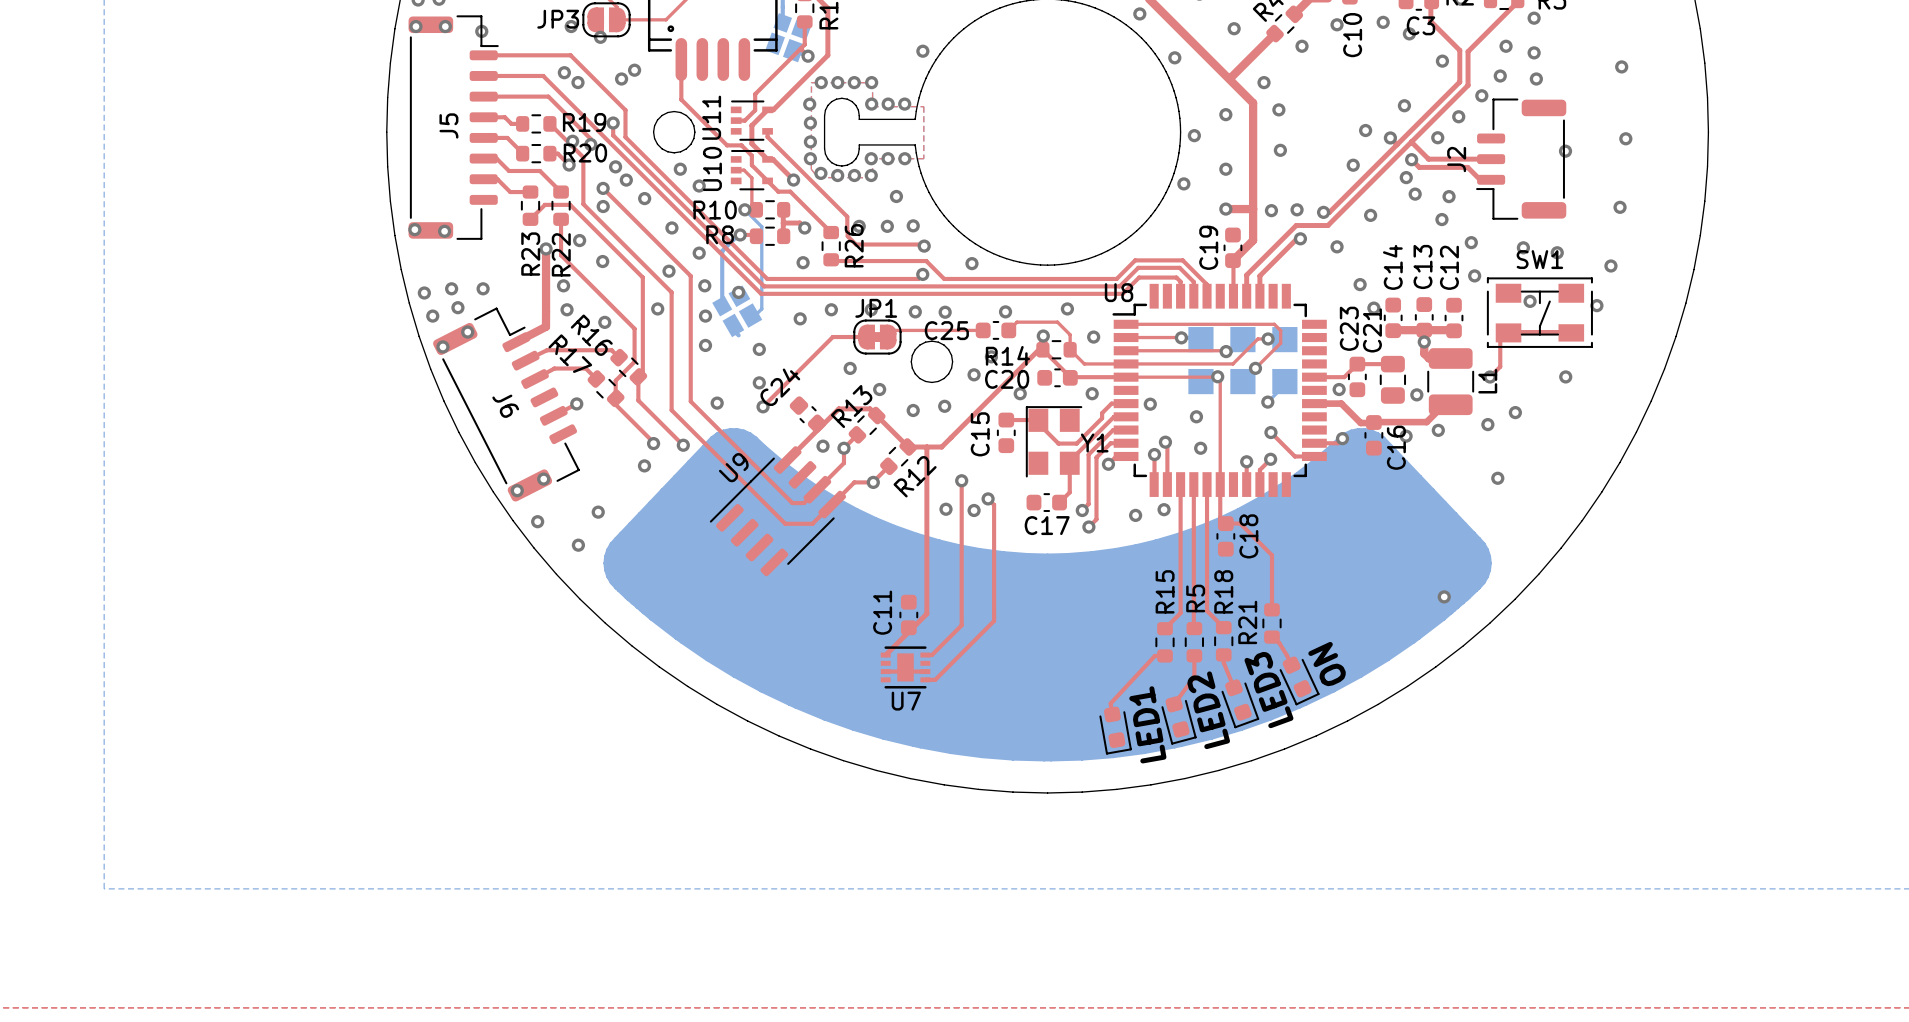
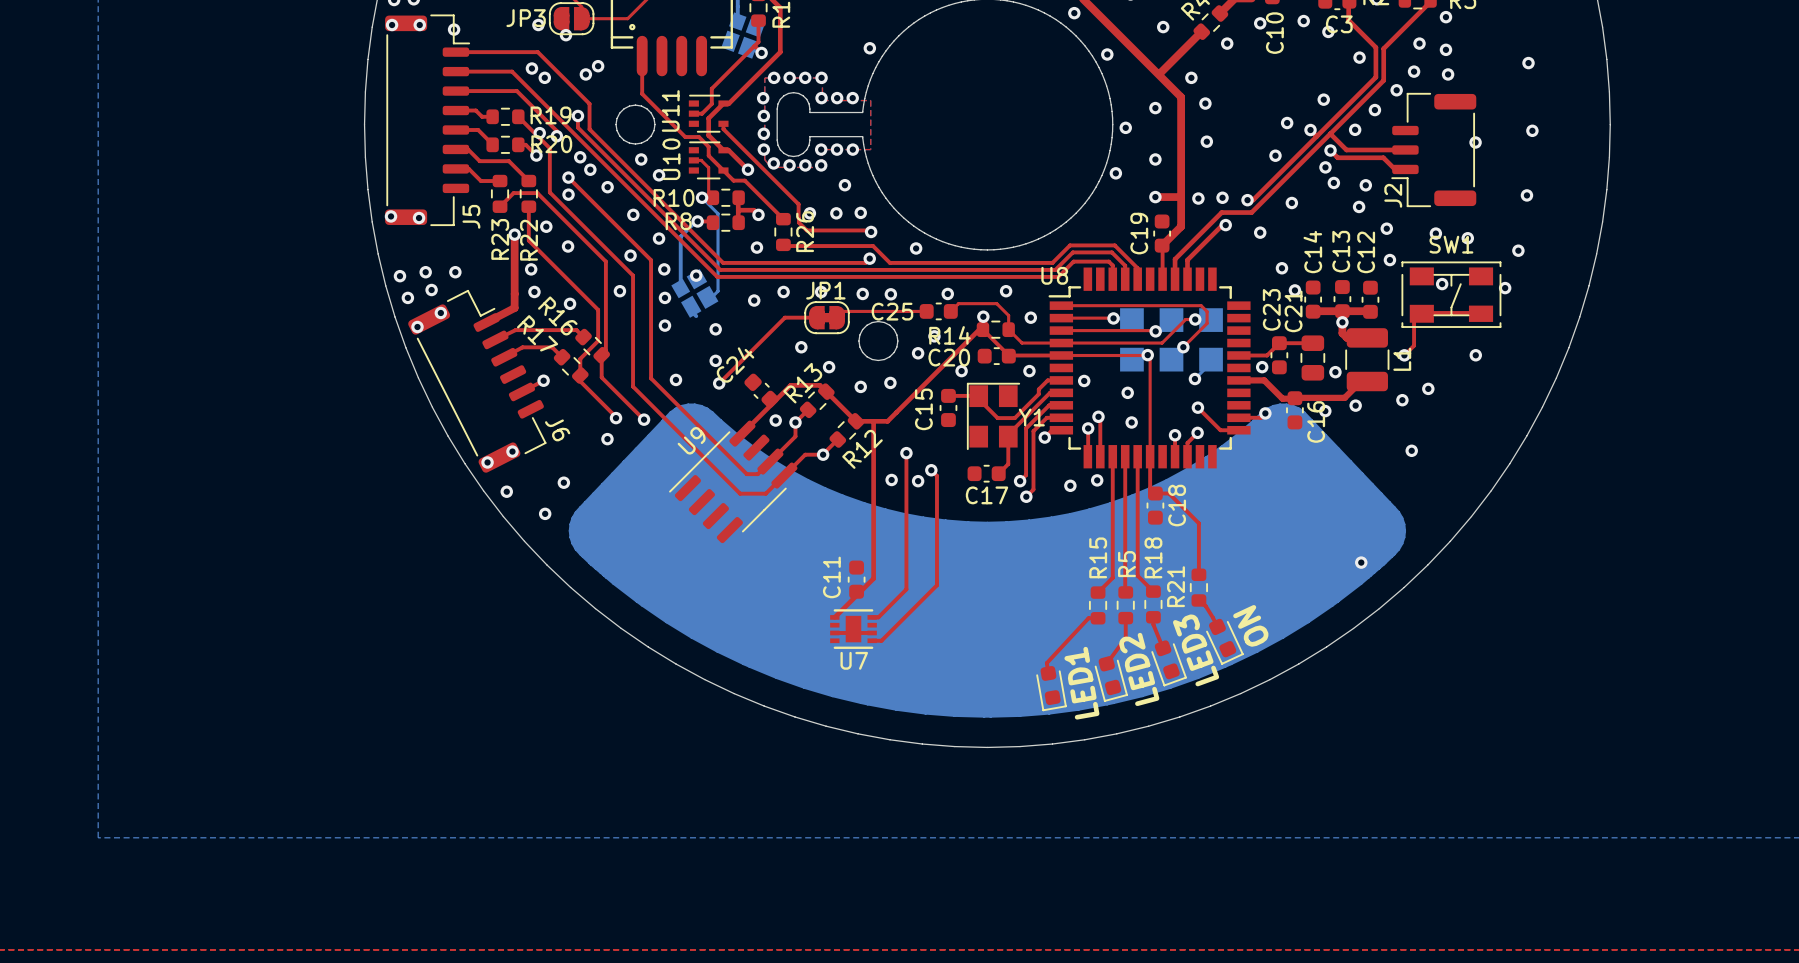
J5 name position: J5 (448, 125) -> J5 (471, 216)
J2 name position: J2 (1456, 159) -> J2 (1393, 195)
J6 name position: J6 (505, 406) -> J6 (557, 430)

